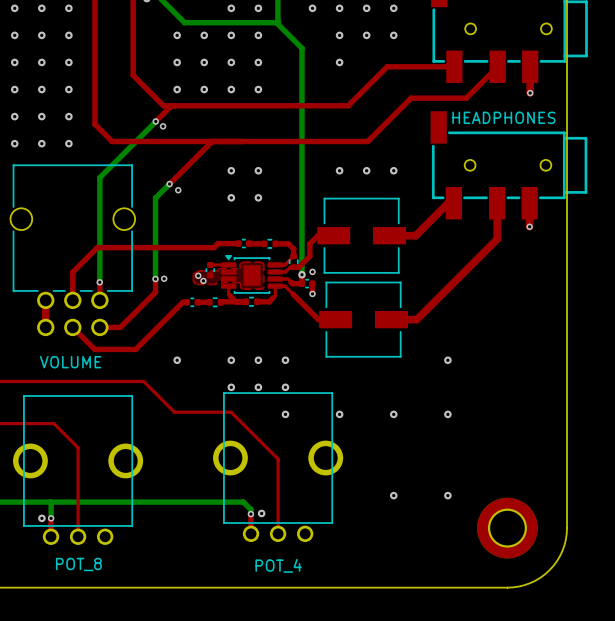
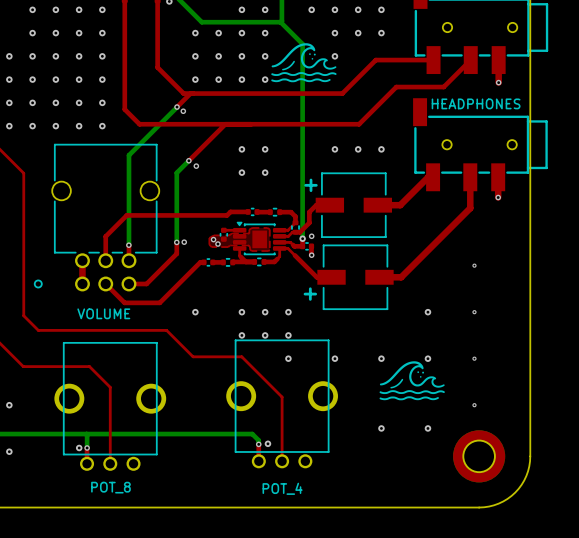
drawing: none -> [271, 43, 337, 83]
text: none -> + (310, 185)
via: none -> (474, 265)
text: none -> + (310, 294)
via: none -> (474, 312)
via: none -> (474, 358)
drawing: none -> [379, 361, 445, 401]
via: none -> (474, 405)

